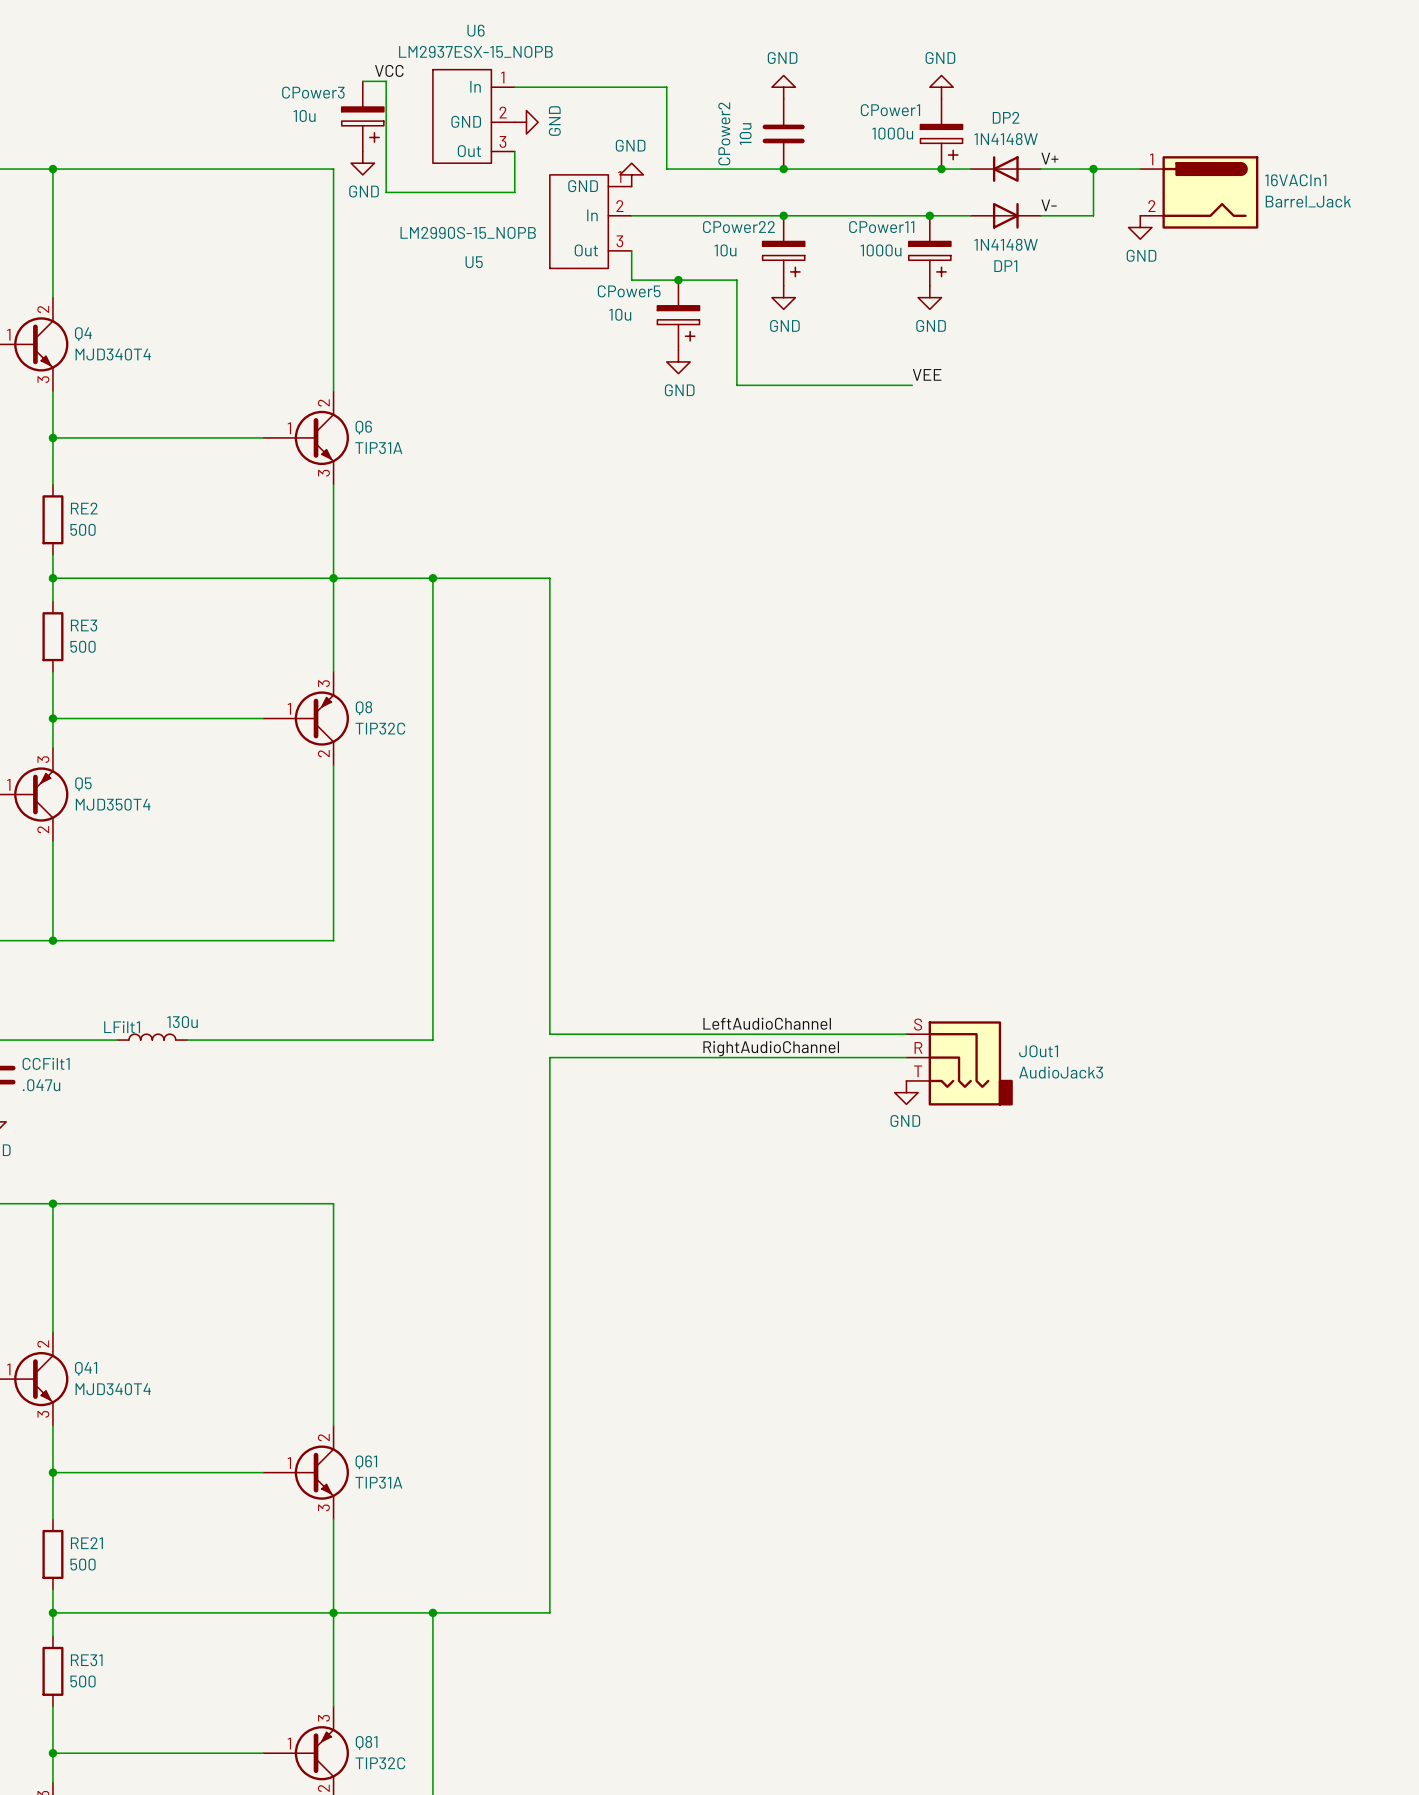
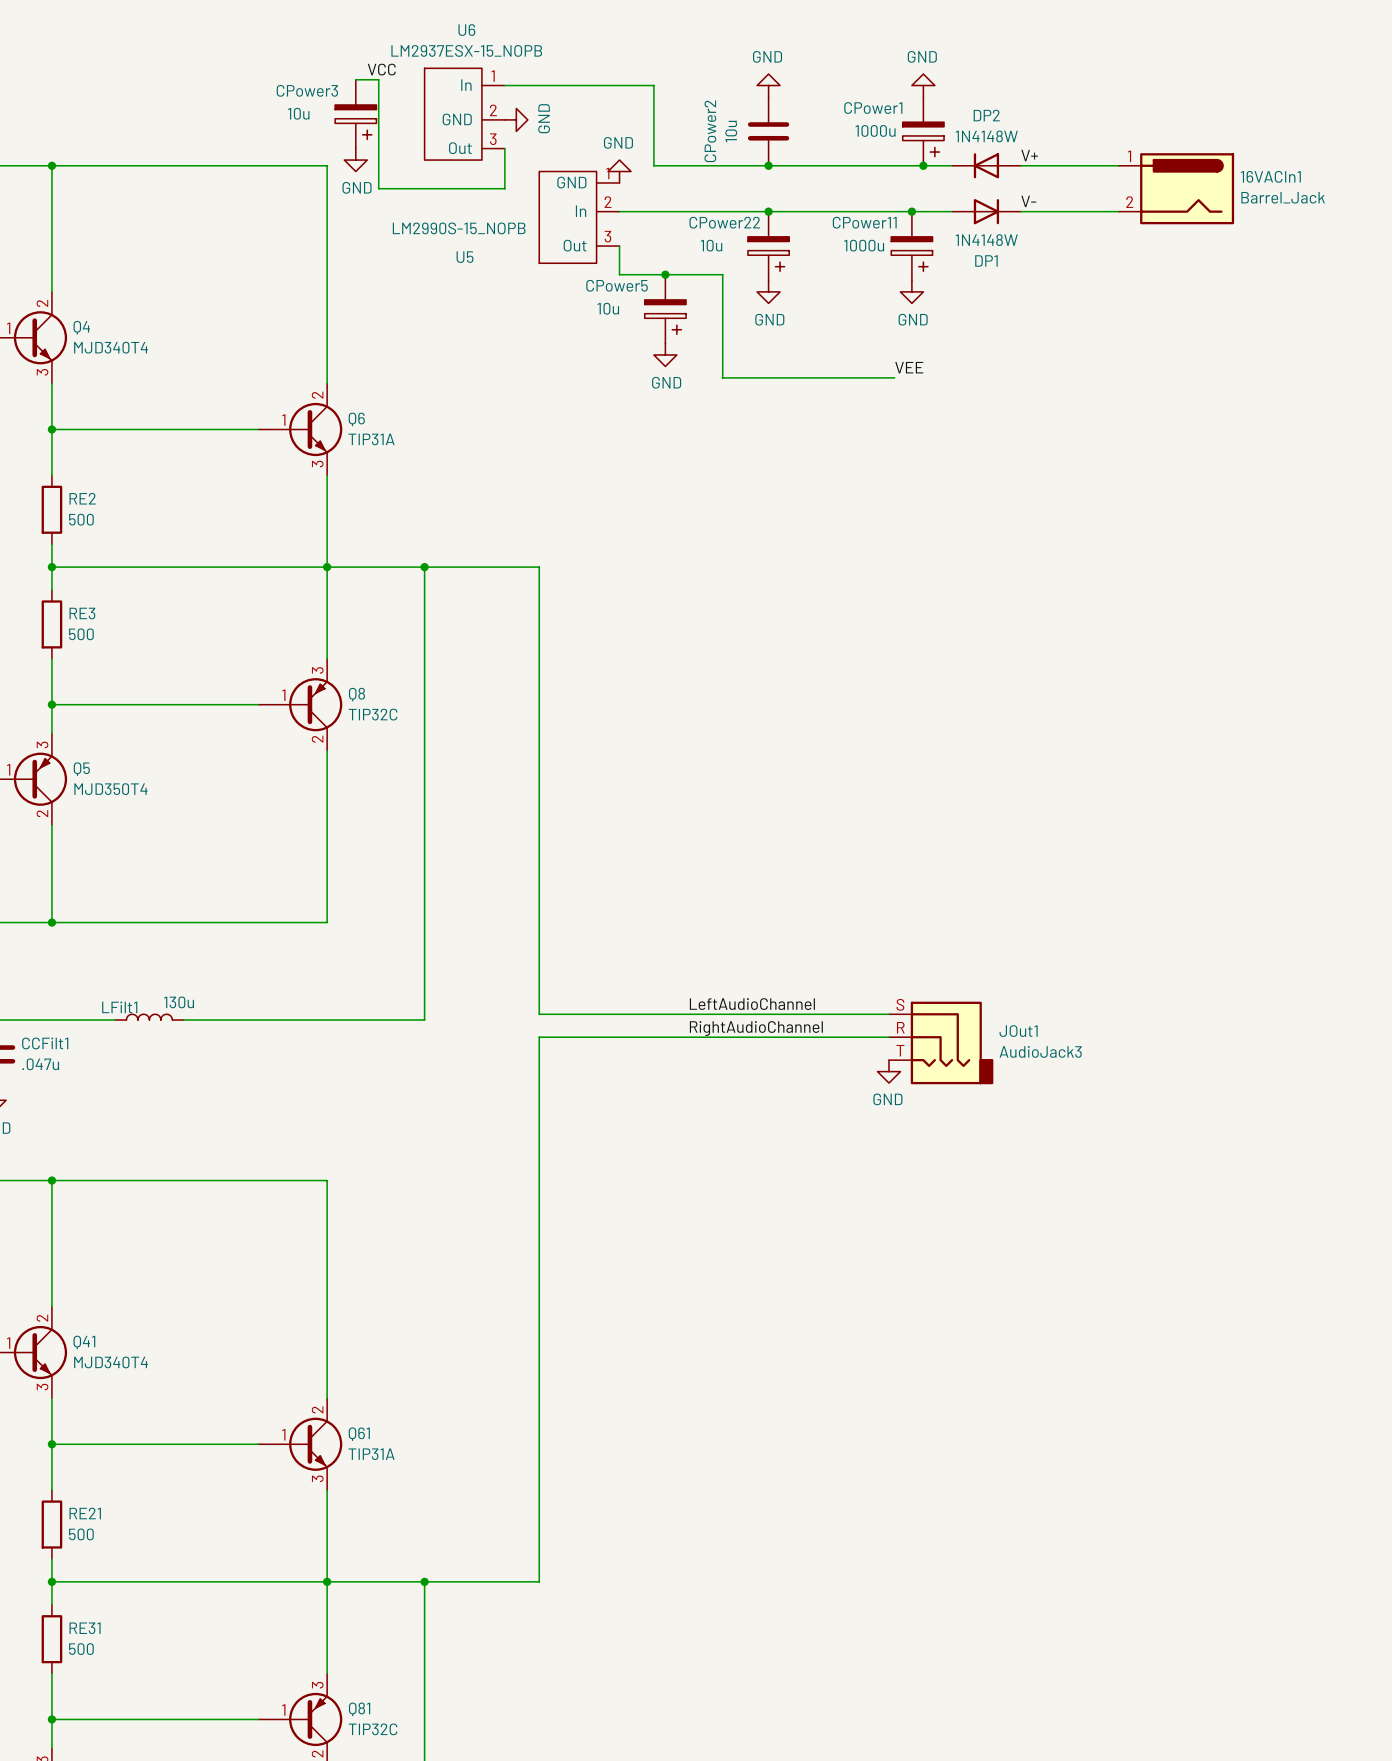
wire: (1093, 169) (1093, 215) -> (1118, 211) (1072, 211)
junction: (1093, 169) -> none
power symbol: GND (1140, 227) -> none

